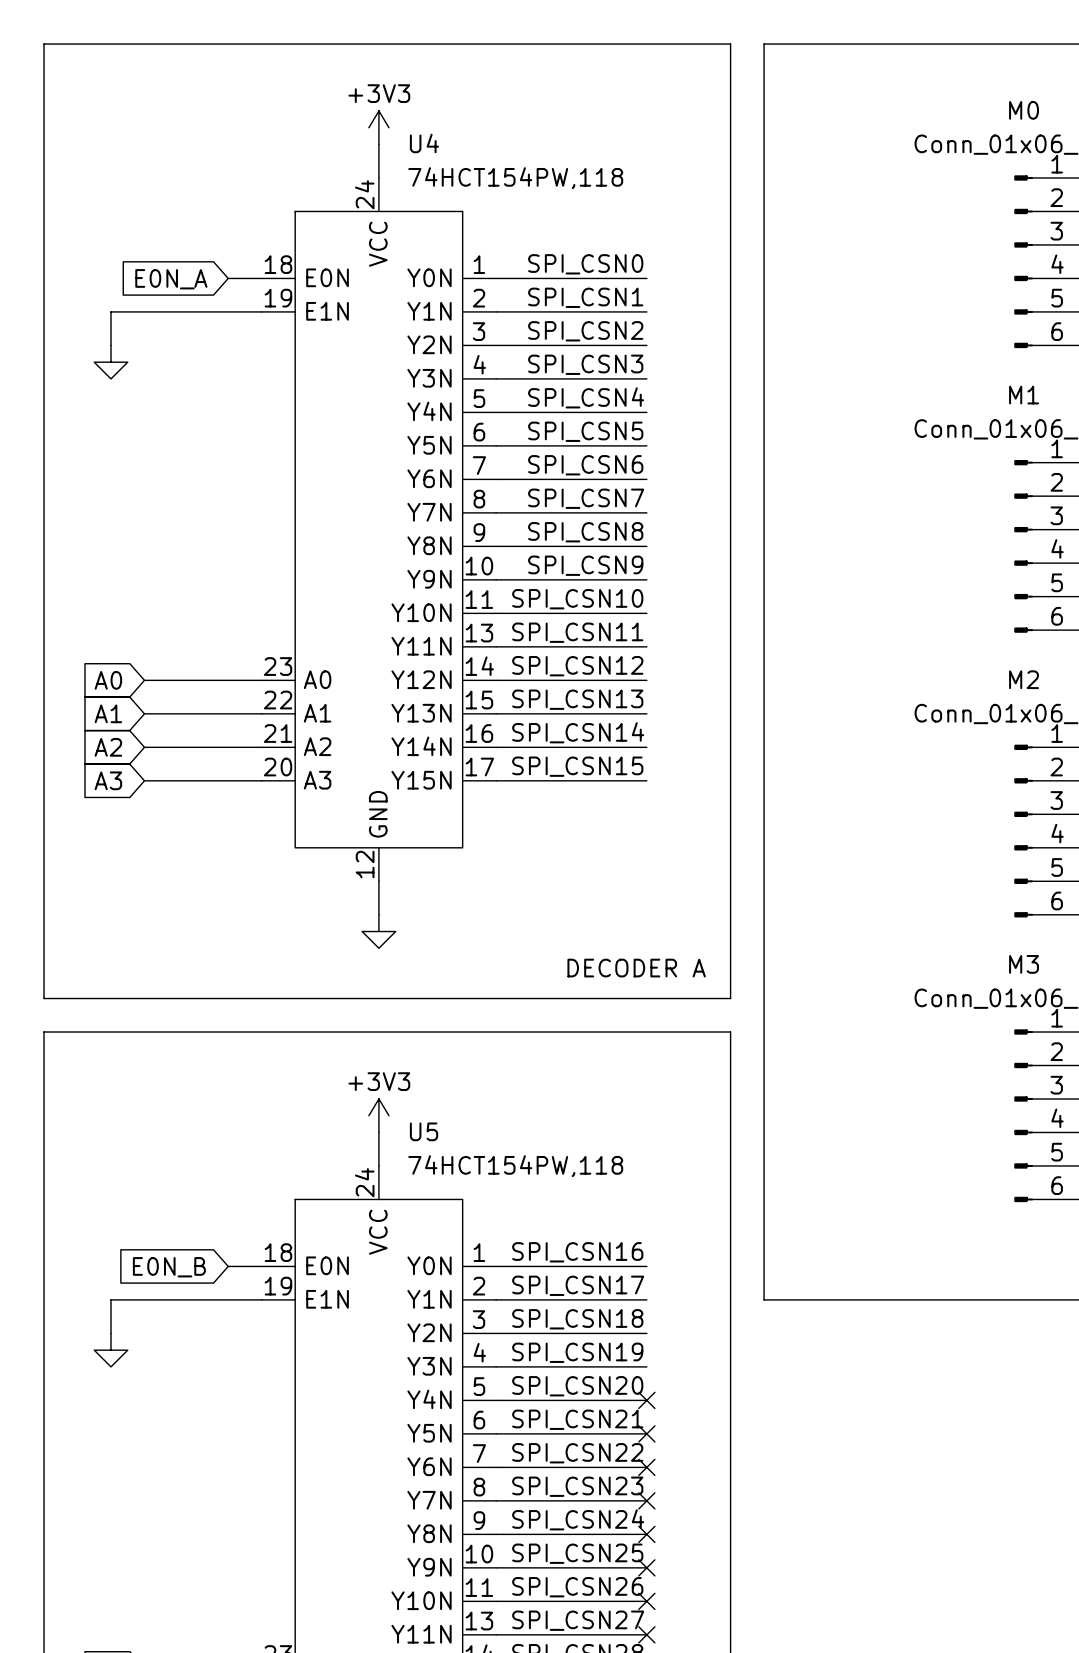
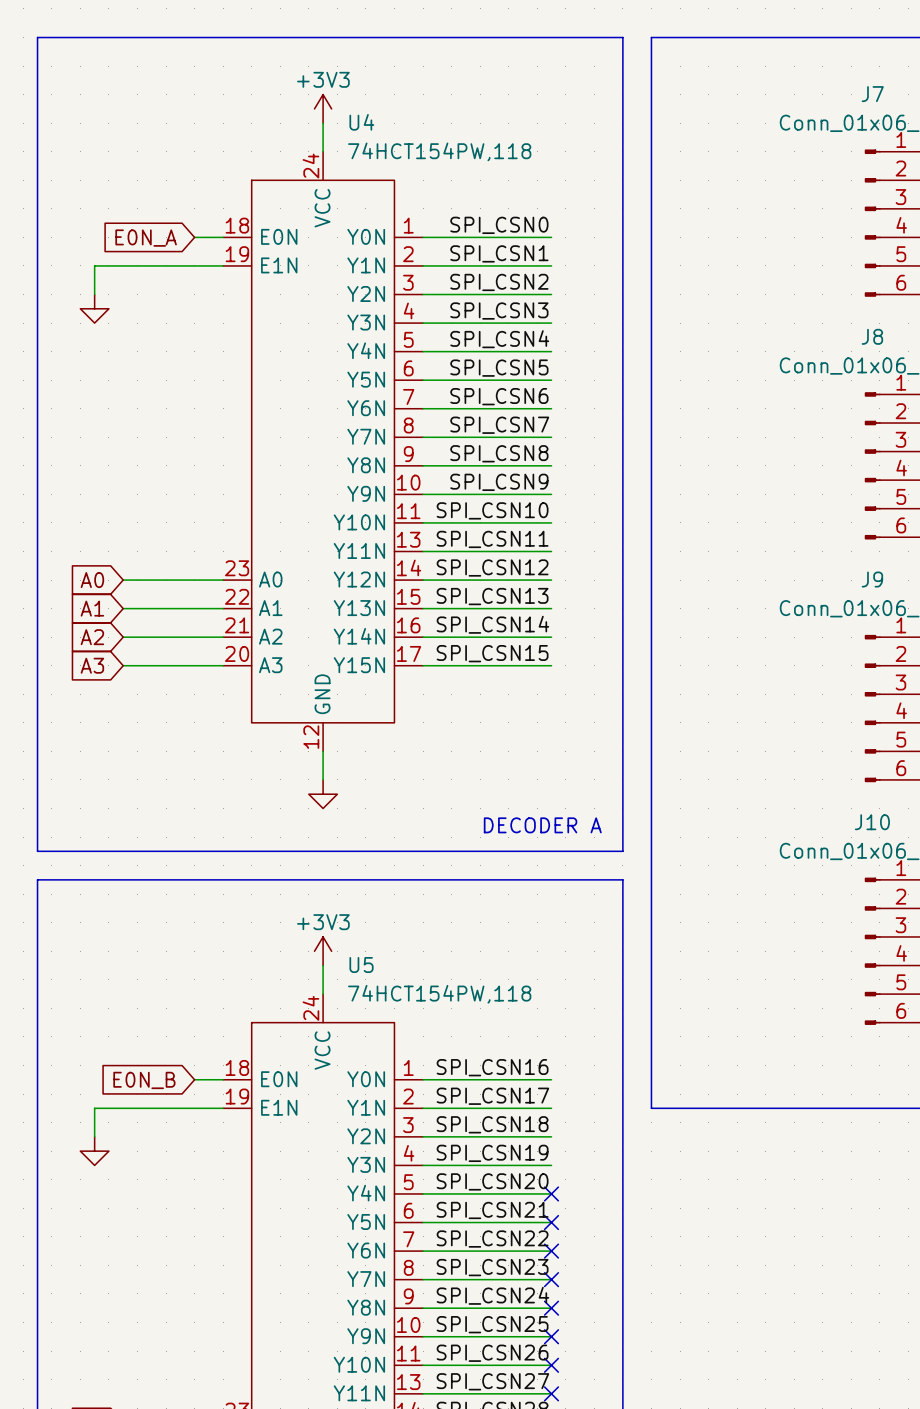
M0 name: M0 (1024, 110) -> J7 (872, 94)
M1 name: M1 (1024, 395) -> J8 (872, 336)
M2 name: M2 (1024, 679) -> J9 (872, 579)
M3 name: M3 (1024, 964) -> J10 (872, 822)

